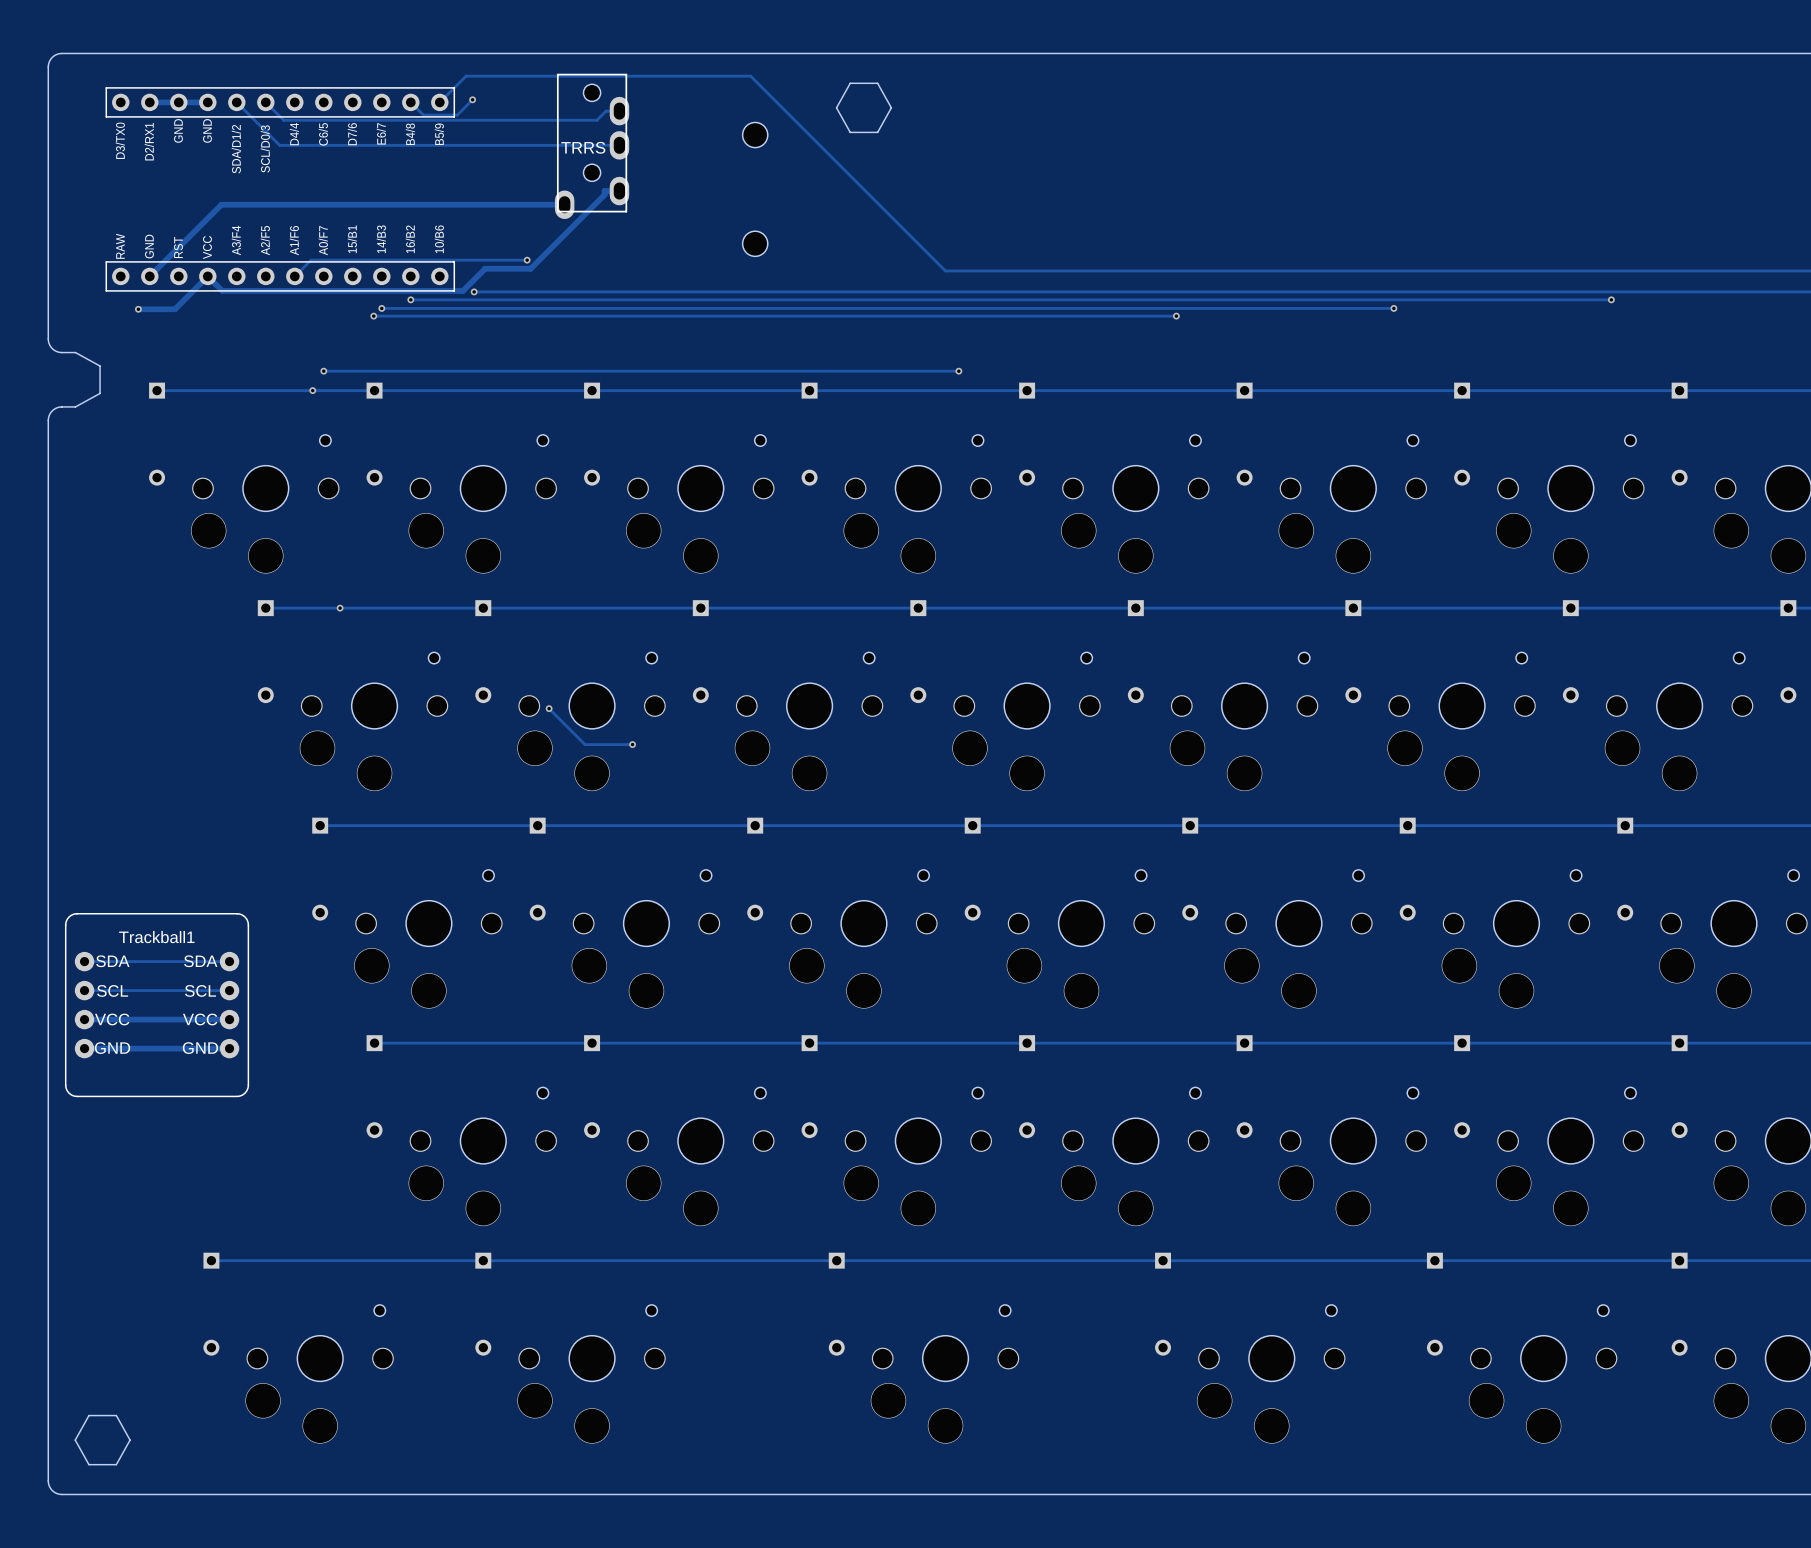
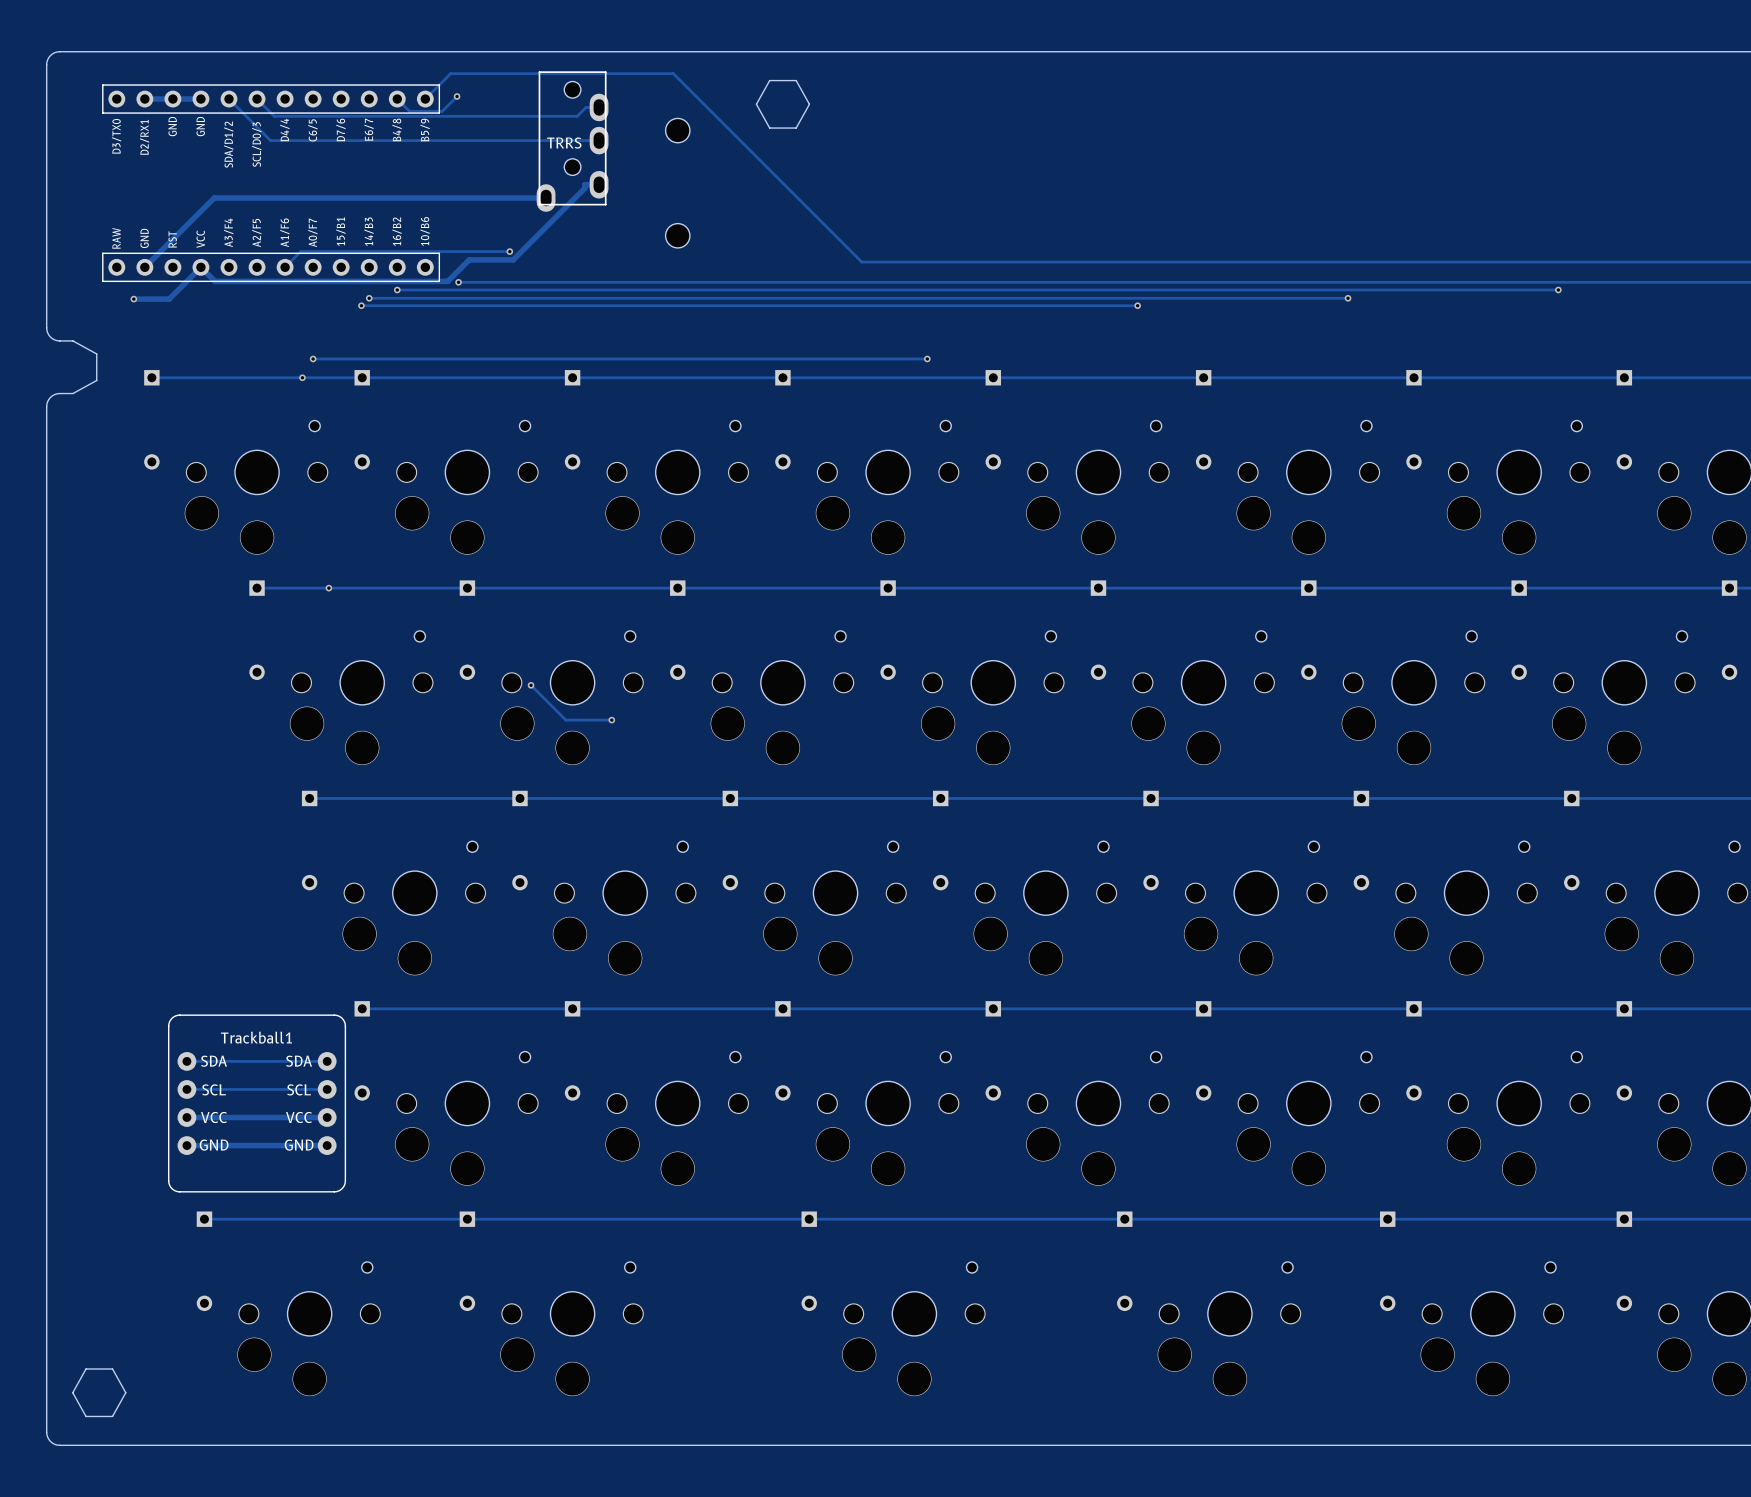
track: (696, 76) (750, 76) (945, 270) -> (673, 73) (861, 262) (914, 262)
drawing position: (863, 107) -> (782, 104)
part position: (755, 135) -> (677, 130)
part position: (755, 243) -> (677, 235)
track: (84, 961) (229, 961) -> (186, 1145) (327, 1145)
track: (84, 990) (229, 990) -> (186, 1117) (327, 1117)
Trackball1 position: (157, 1005) -> (257, 1103)
track: (84, 1019) (229, 1019) -> (186, 1089) (327, 1089)
track: (84, 1048) (229, 1048) -> (186, 1061) (327, 1061)

